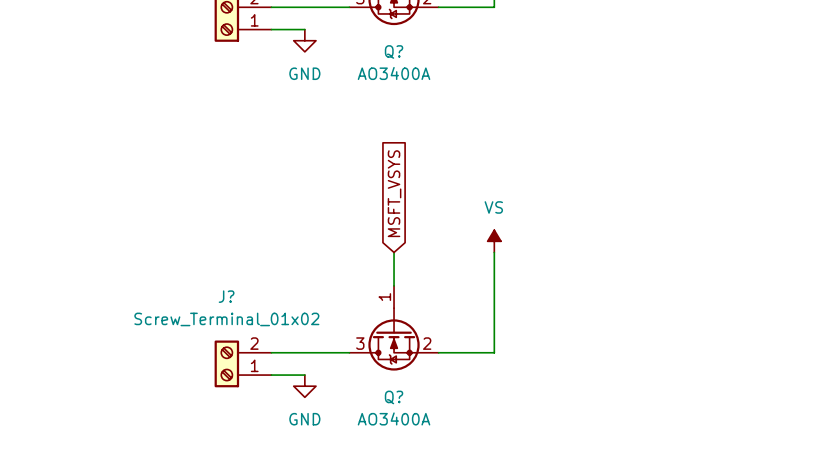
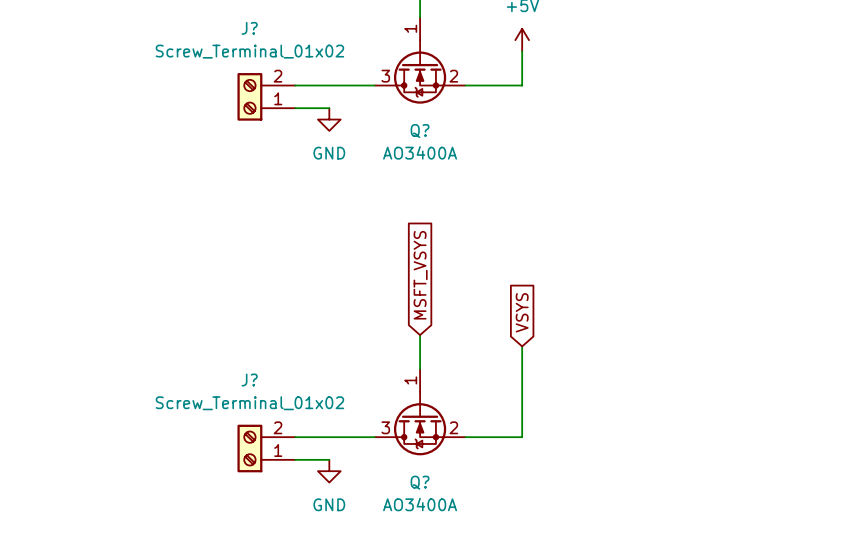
global label: none -> VSYS (522, 312)
power symbol: VS (494, 241) -> none
wire: (494, 252) (494, 263) -> none

